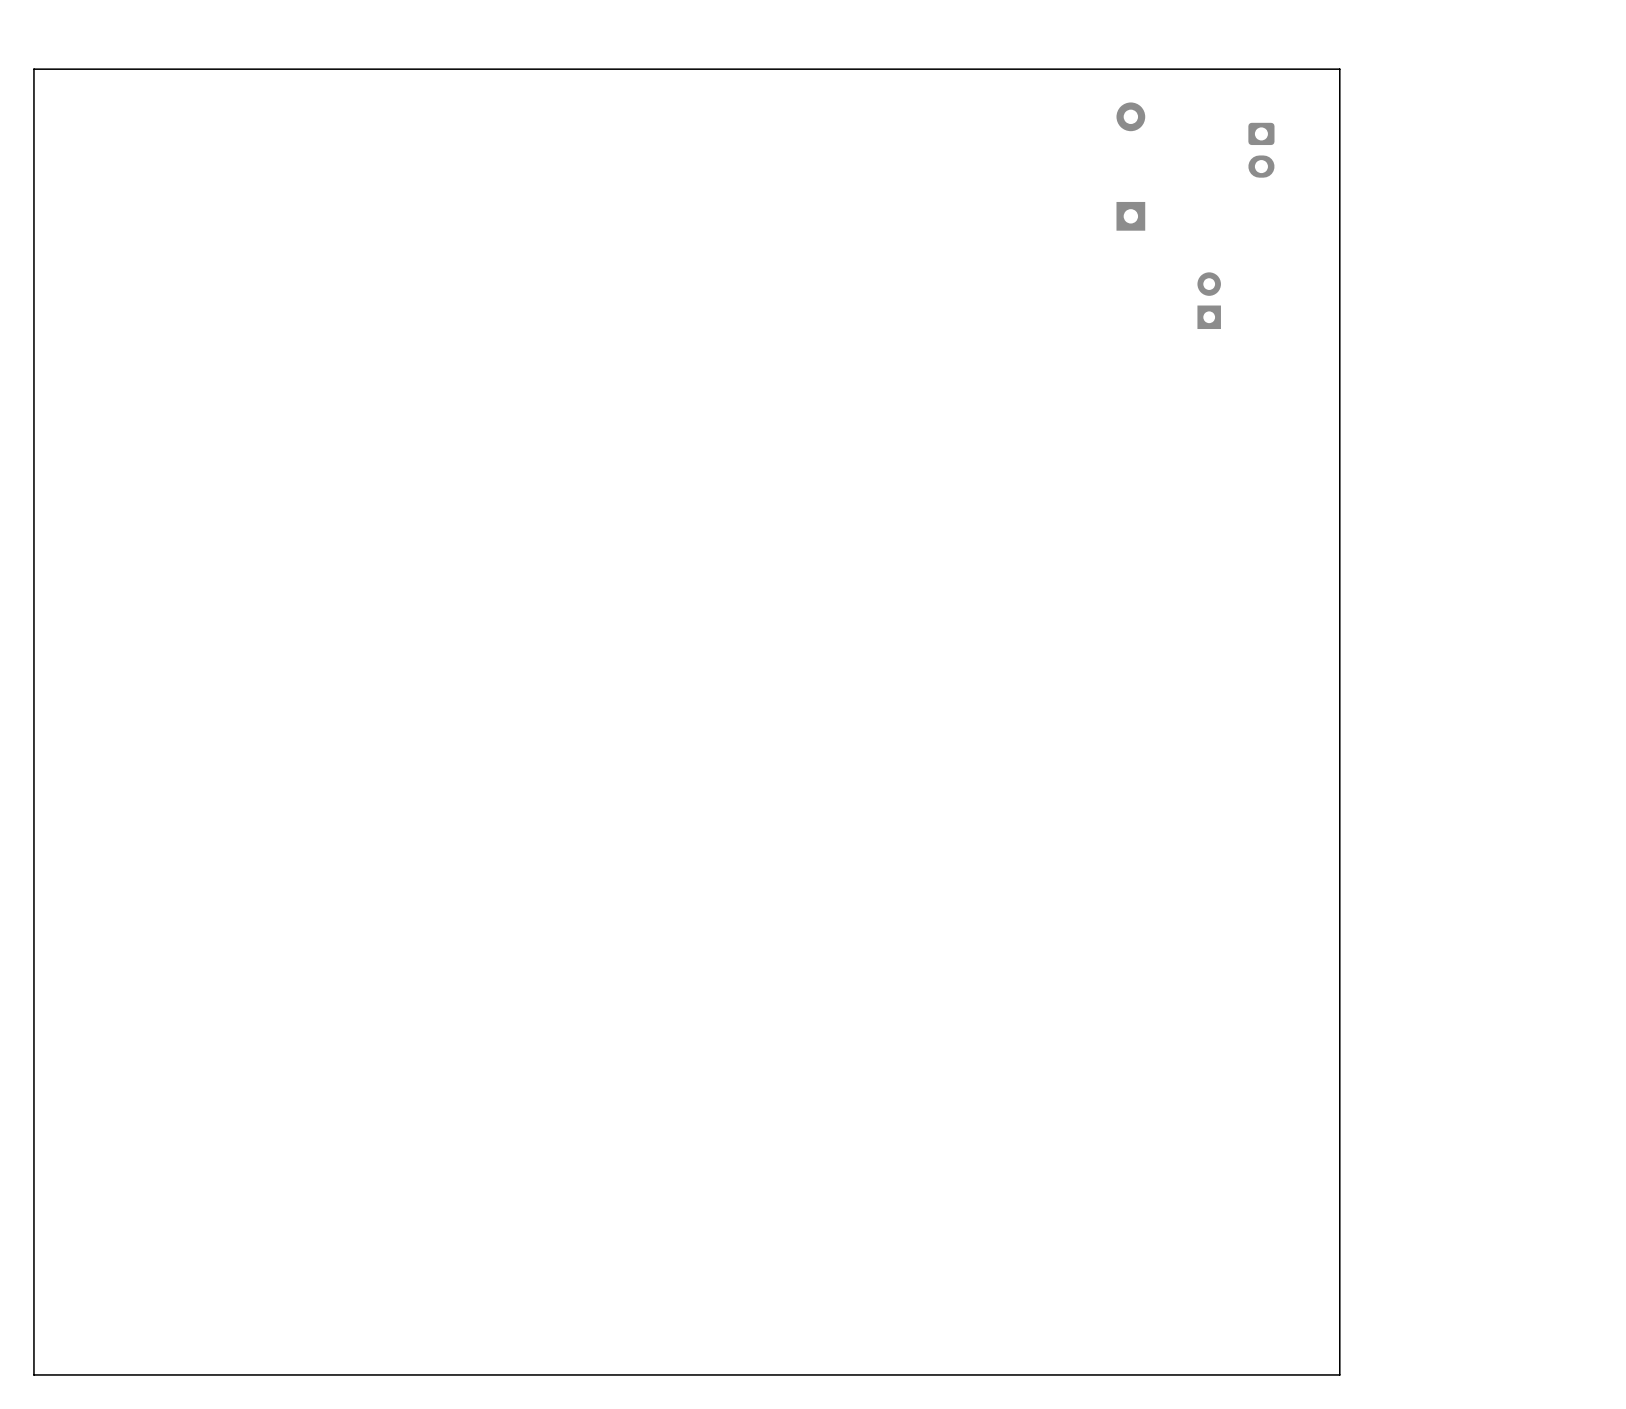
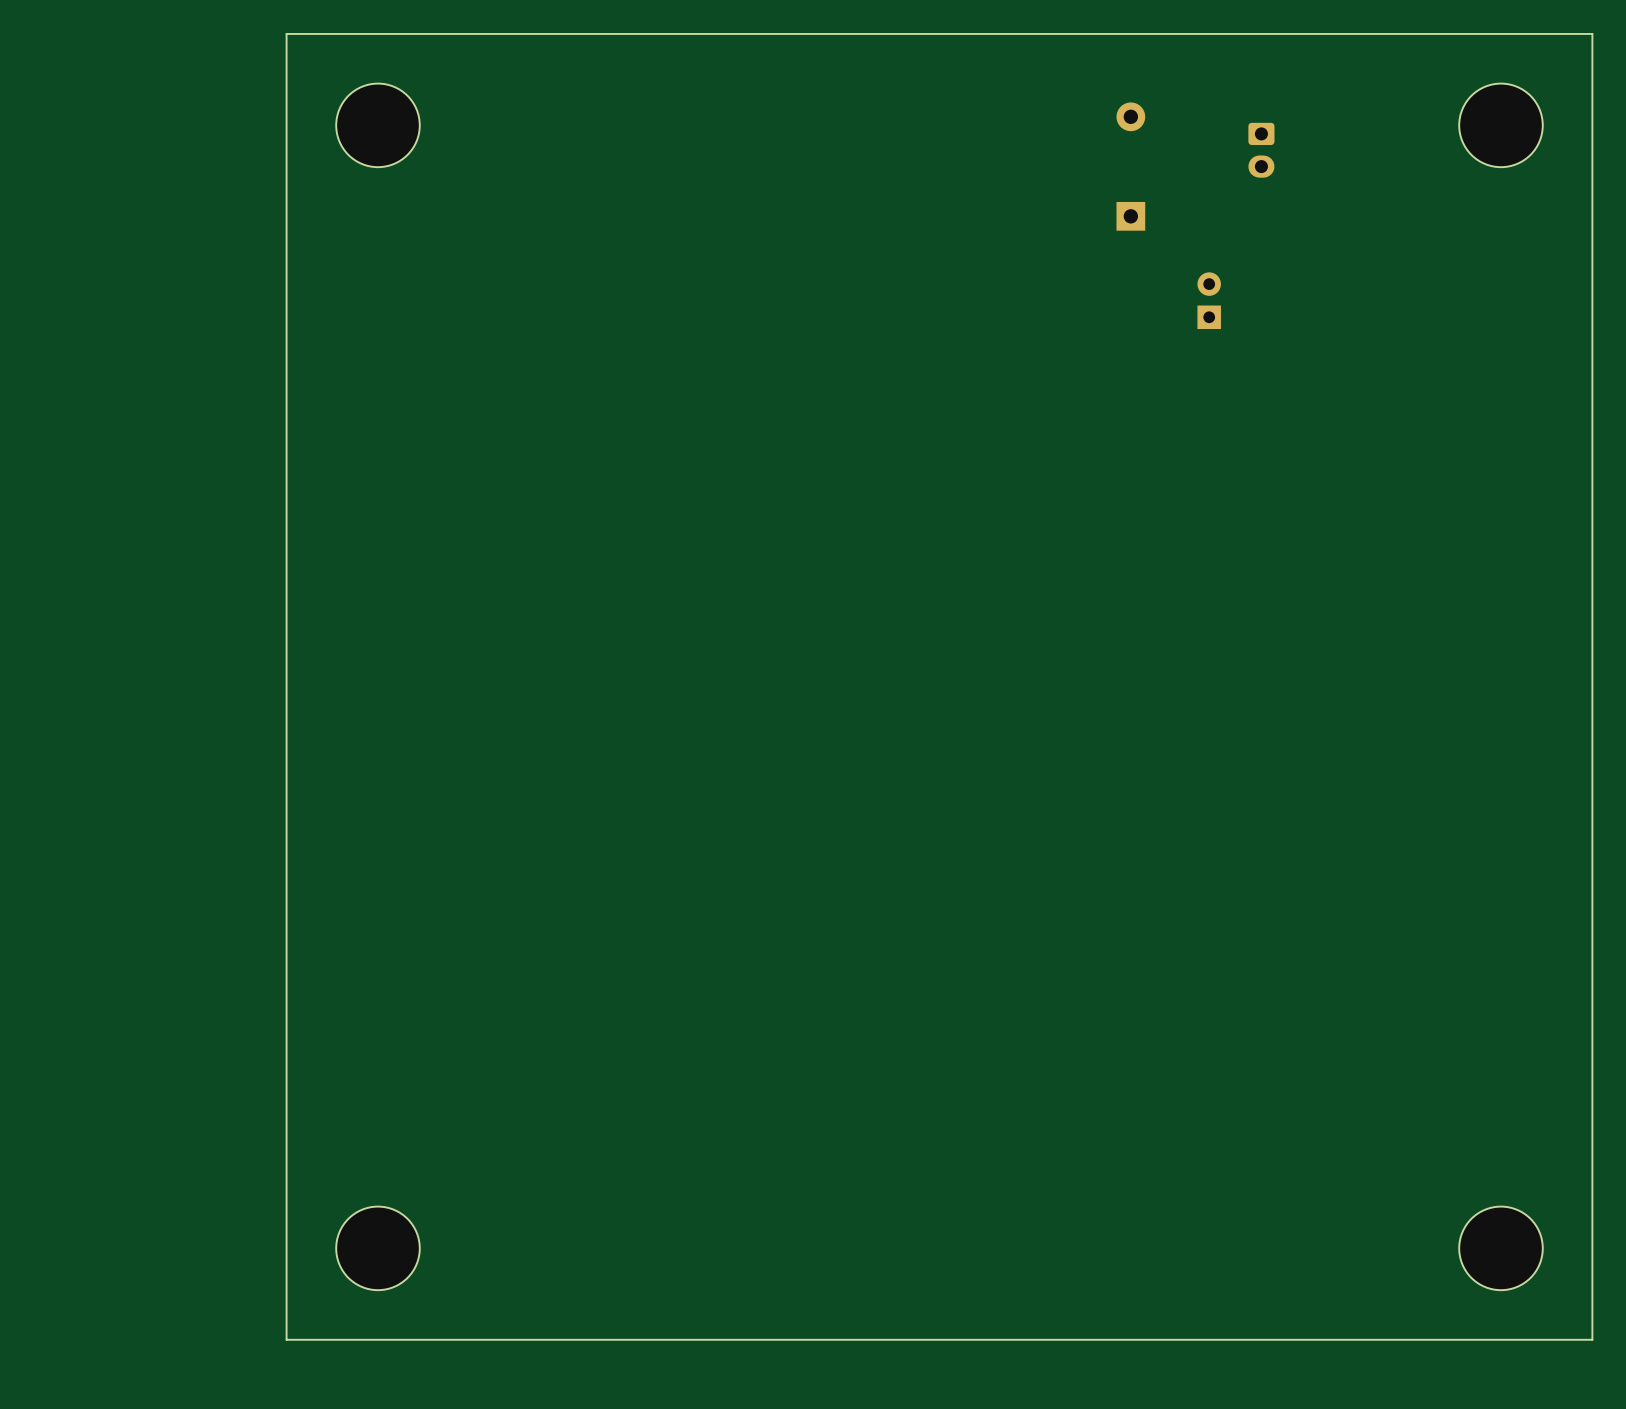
board edge: (1339, 69) (33, 69) (33, 1374) (1339, 1374) (1339, 69) -> (1592, 33) (286, 33) (286, 1339) (1592, 1339) (1592, 33)
part: none -> (377, 125)
part: none -> (1500, 125)
part: none -> (377, 1248)
part: none -> (1500, 1248)

